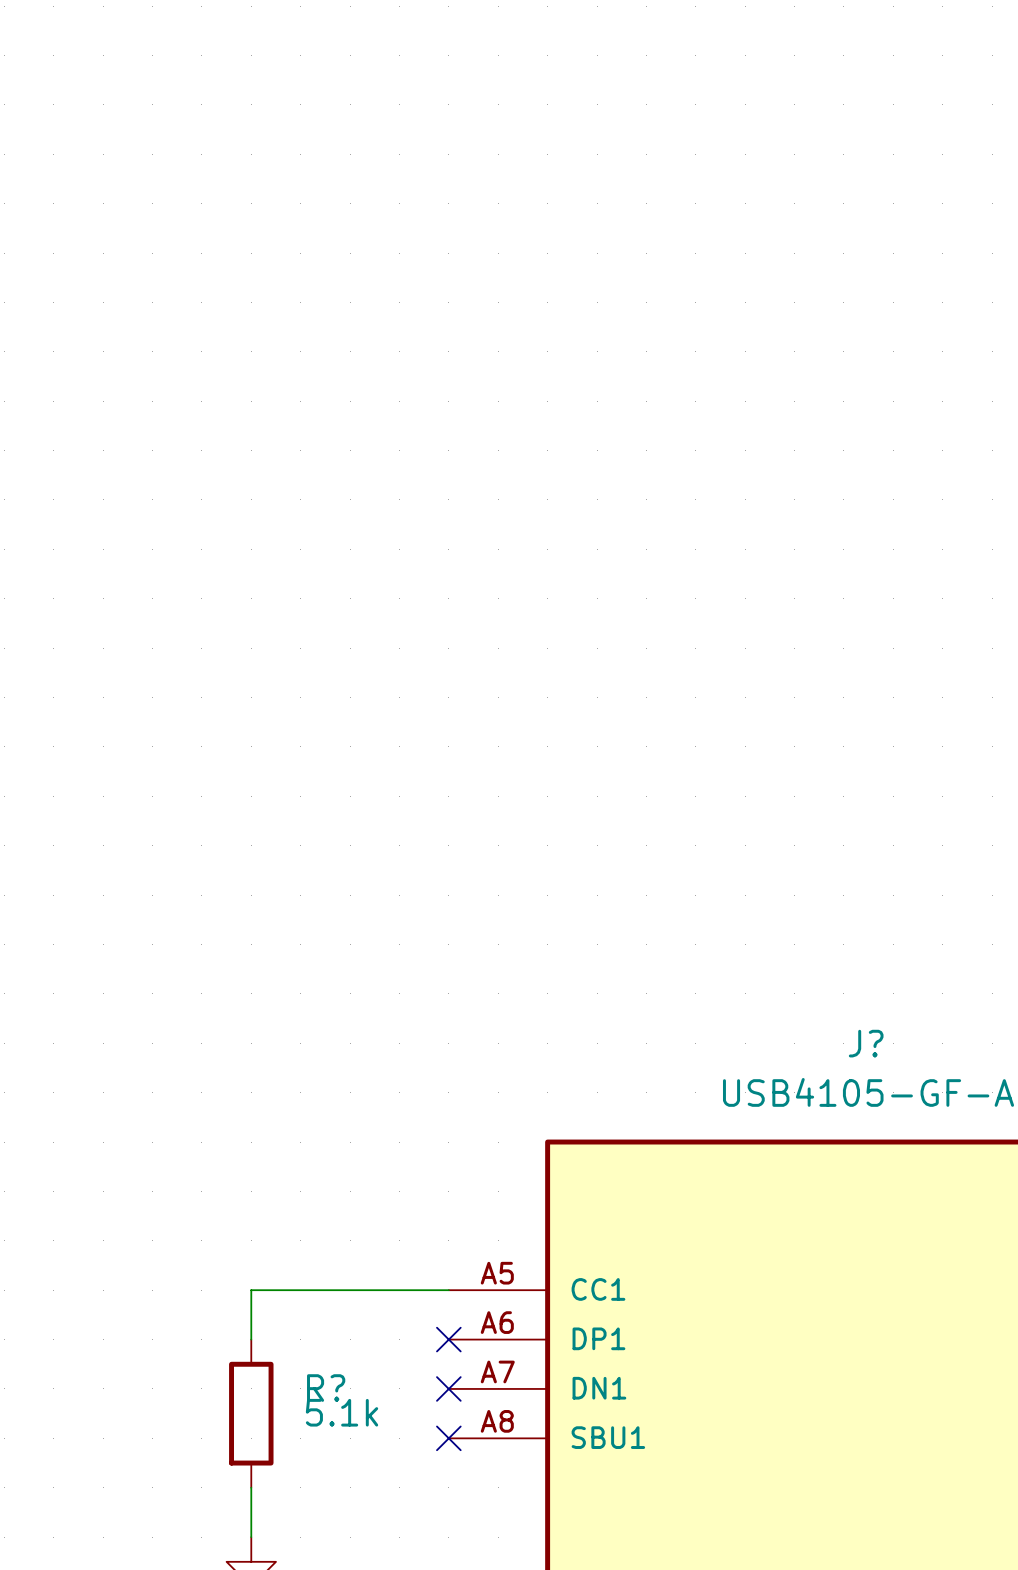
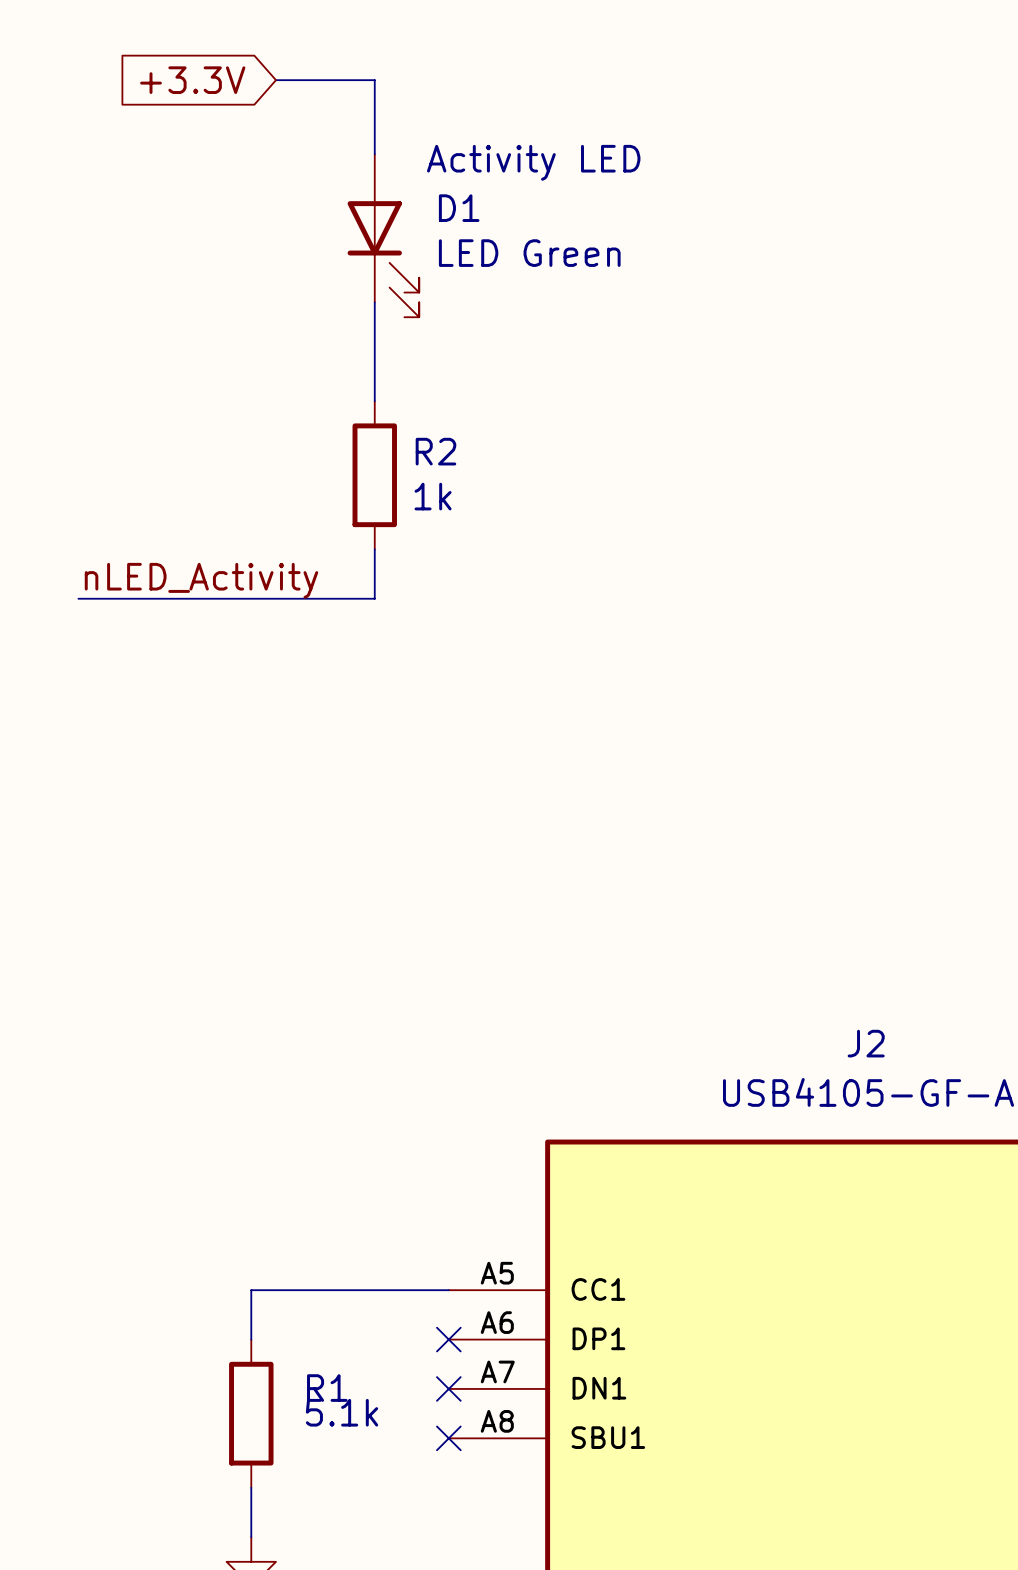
global label: none -> +3.3V (192, 80)
wire: none -> (275, 80) (374, 80) (374, 154)
text: none -> Activity LED (533, 162)
D1: none -> LED Green (383, 235)
wire: none -> (374, 302) (374, 401)
R2: none -> 1k (374, 475)
wire: none -> (374, 549) (374, 598) (78, 598)
label: none -> nLED_Activity (201, 580)
J? name: J? (866, 1043) -> J2 (866, 1043)
R? name: R? (326, 1388) -> R1 (327, 1388)

